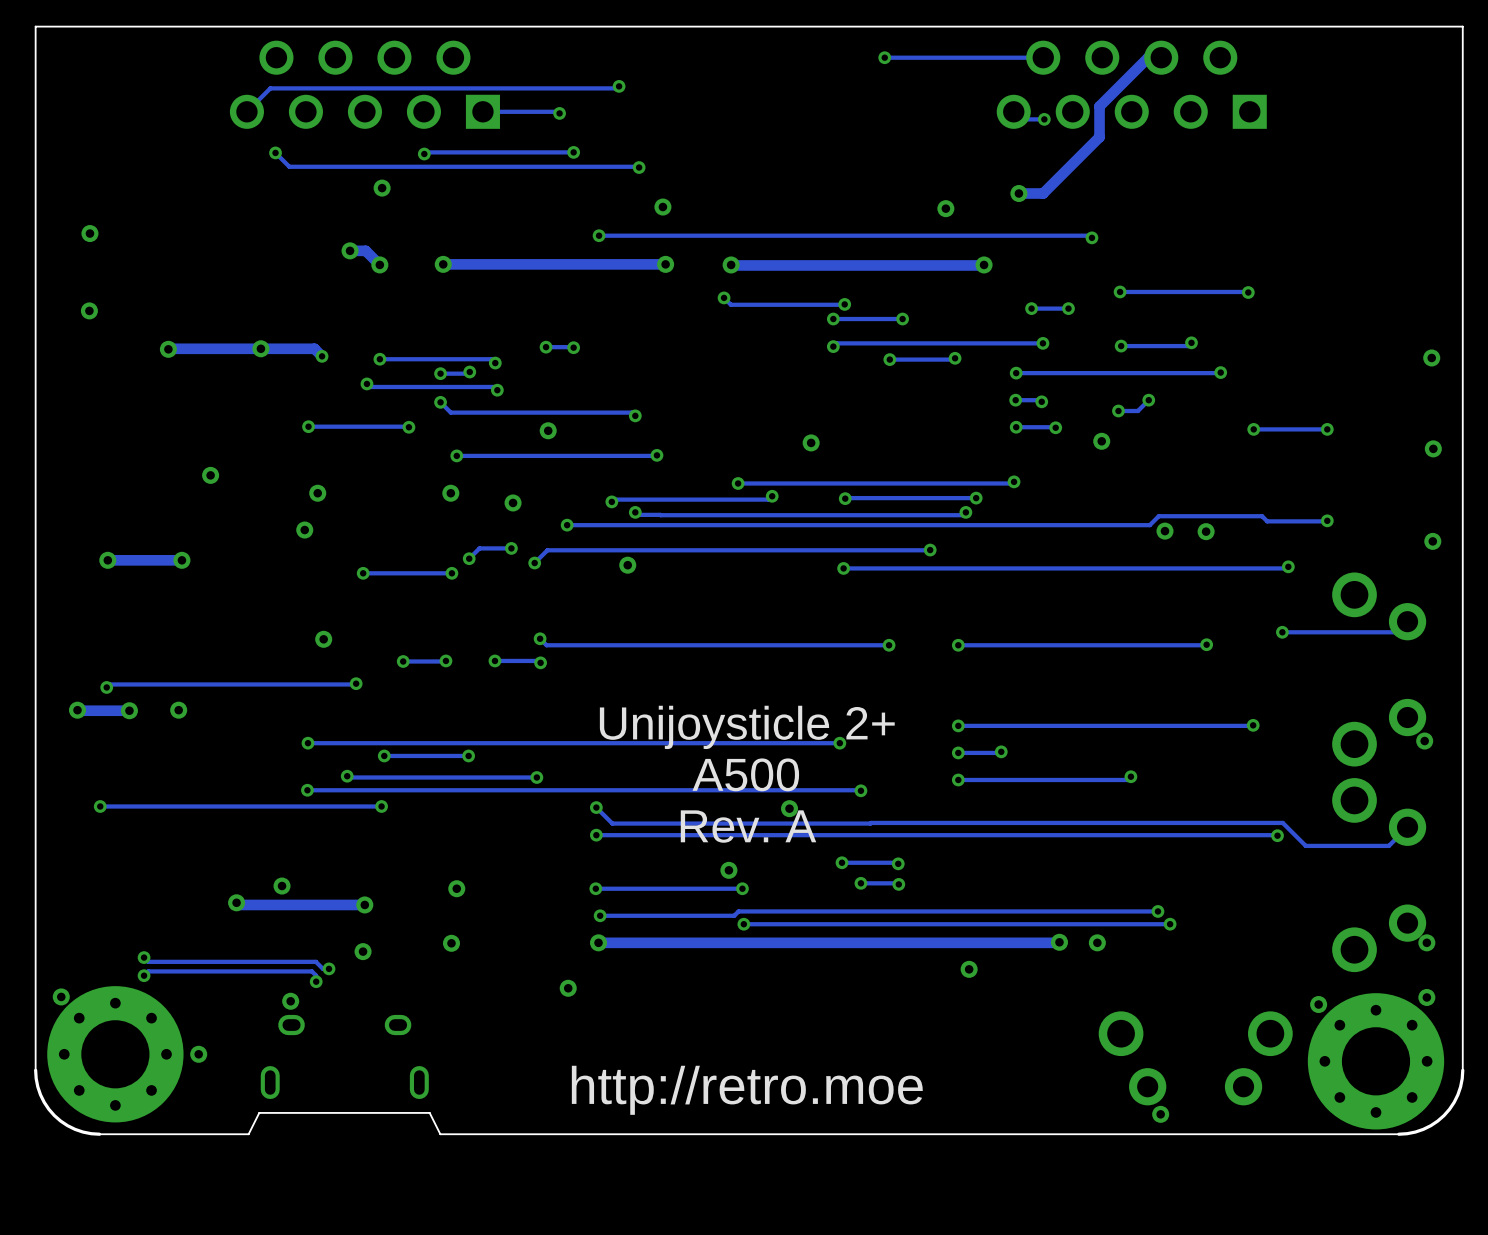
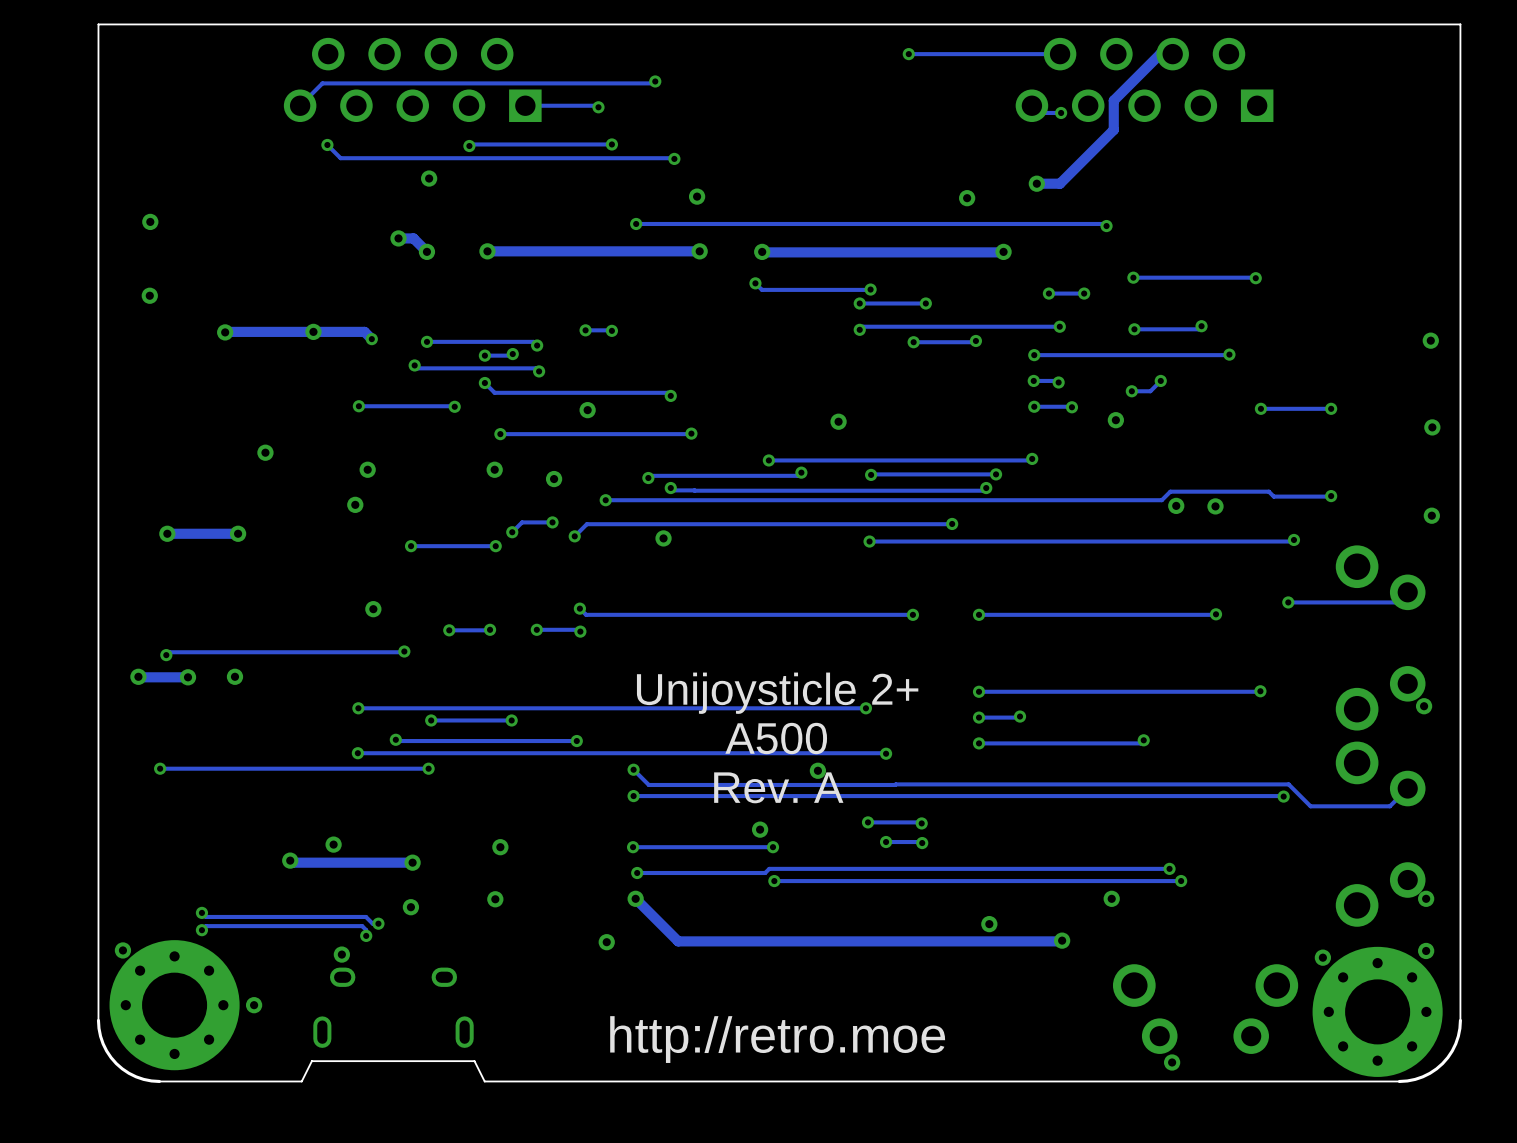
track: (1059, 942) (598, 942) -> (1062, 940) (678, 941) (635, 898)
via position: (1059, 942) -> (1062, 940)

